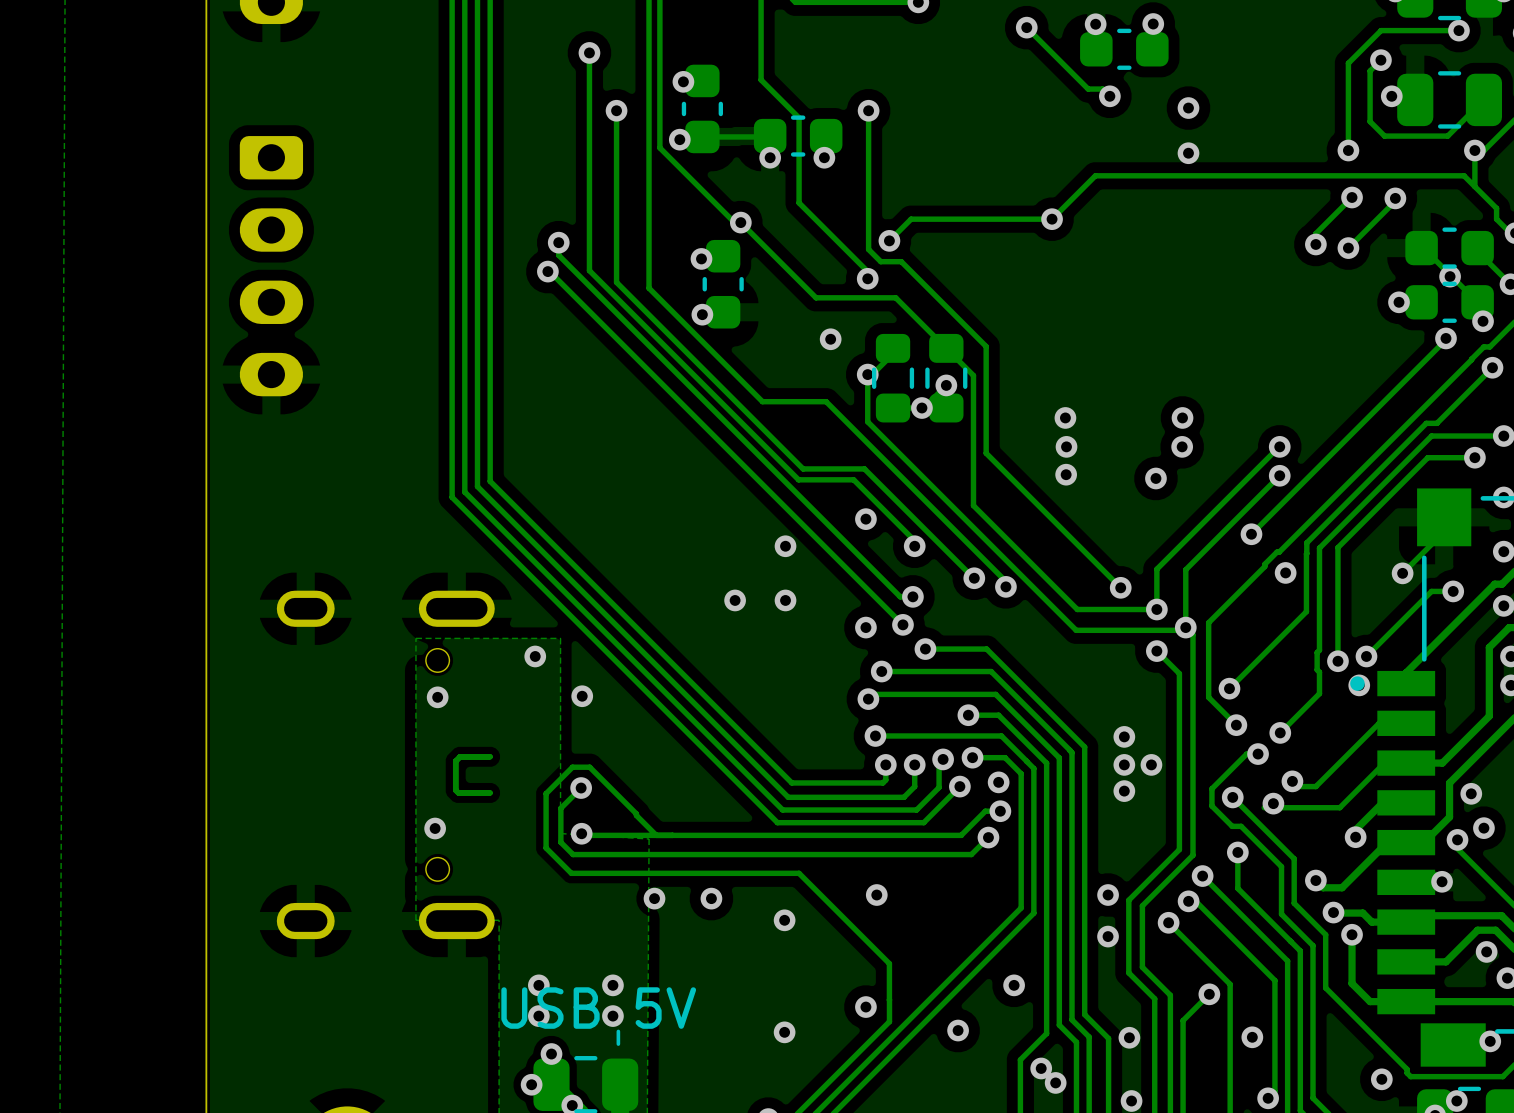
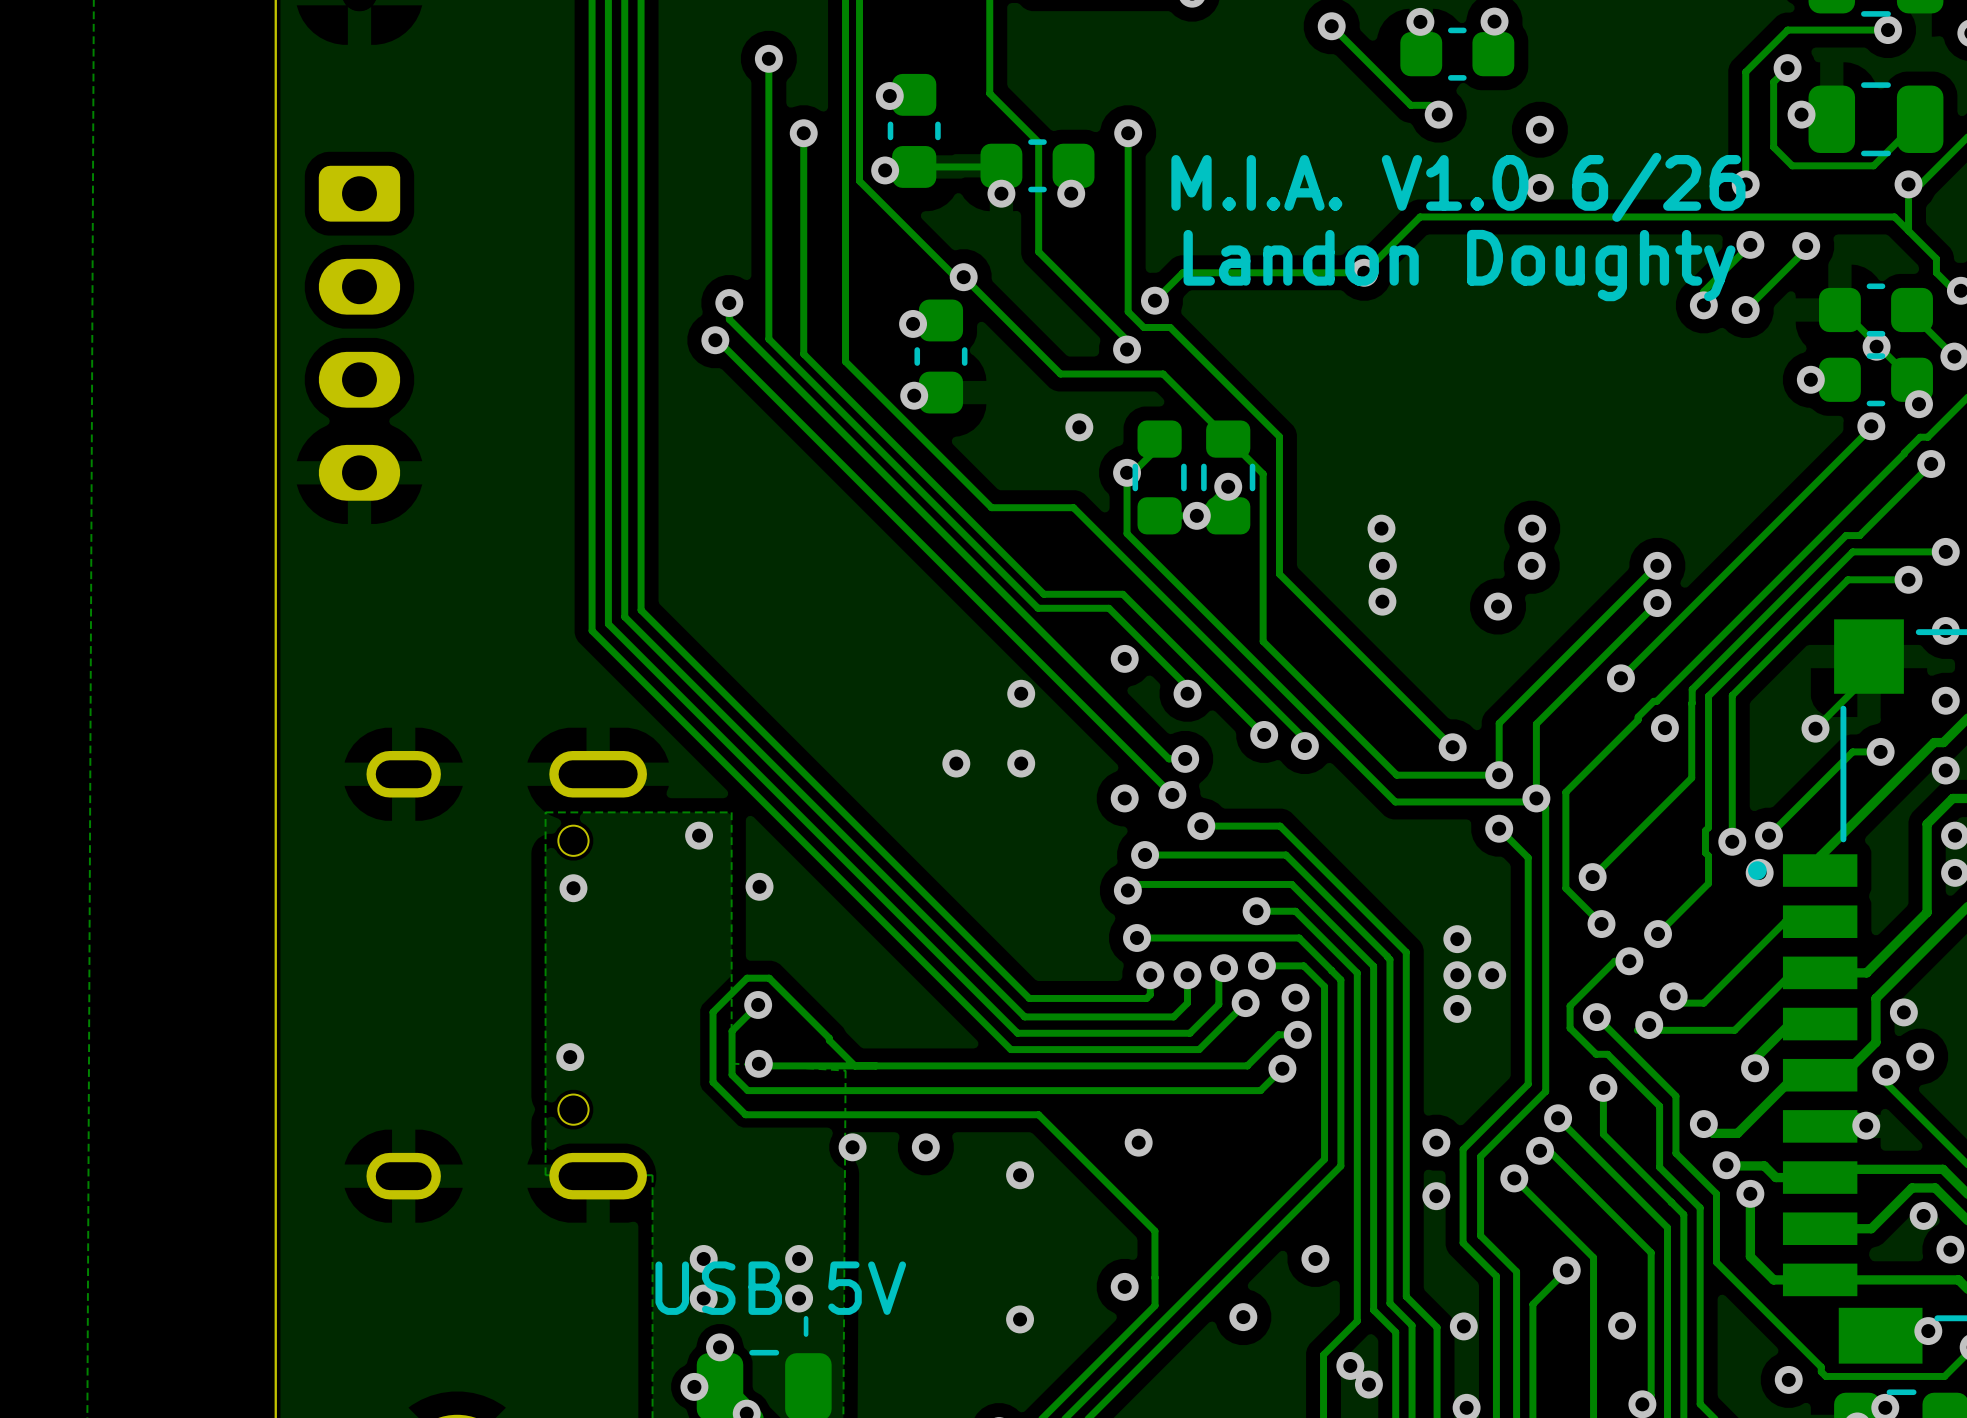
text: none -> M.I.A. V1.0 6/26 (1458, 187)
text: none -> Landon Doughty (1459, 265)
track: (490, 756) (460, 756) (455, 761) (455, 790) (458, 792) (490, 792) -> none

